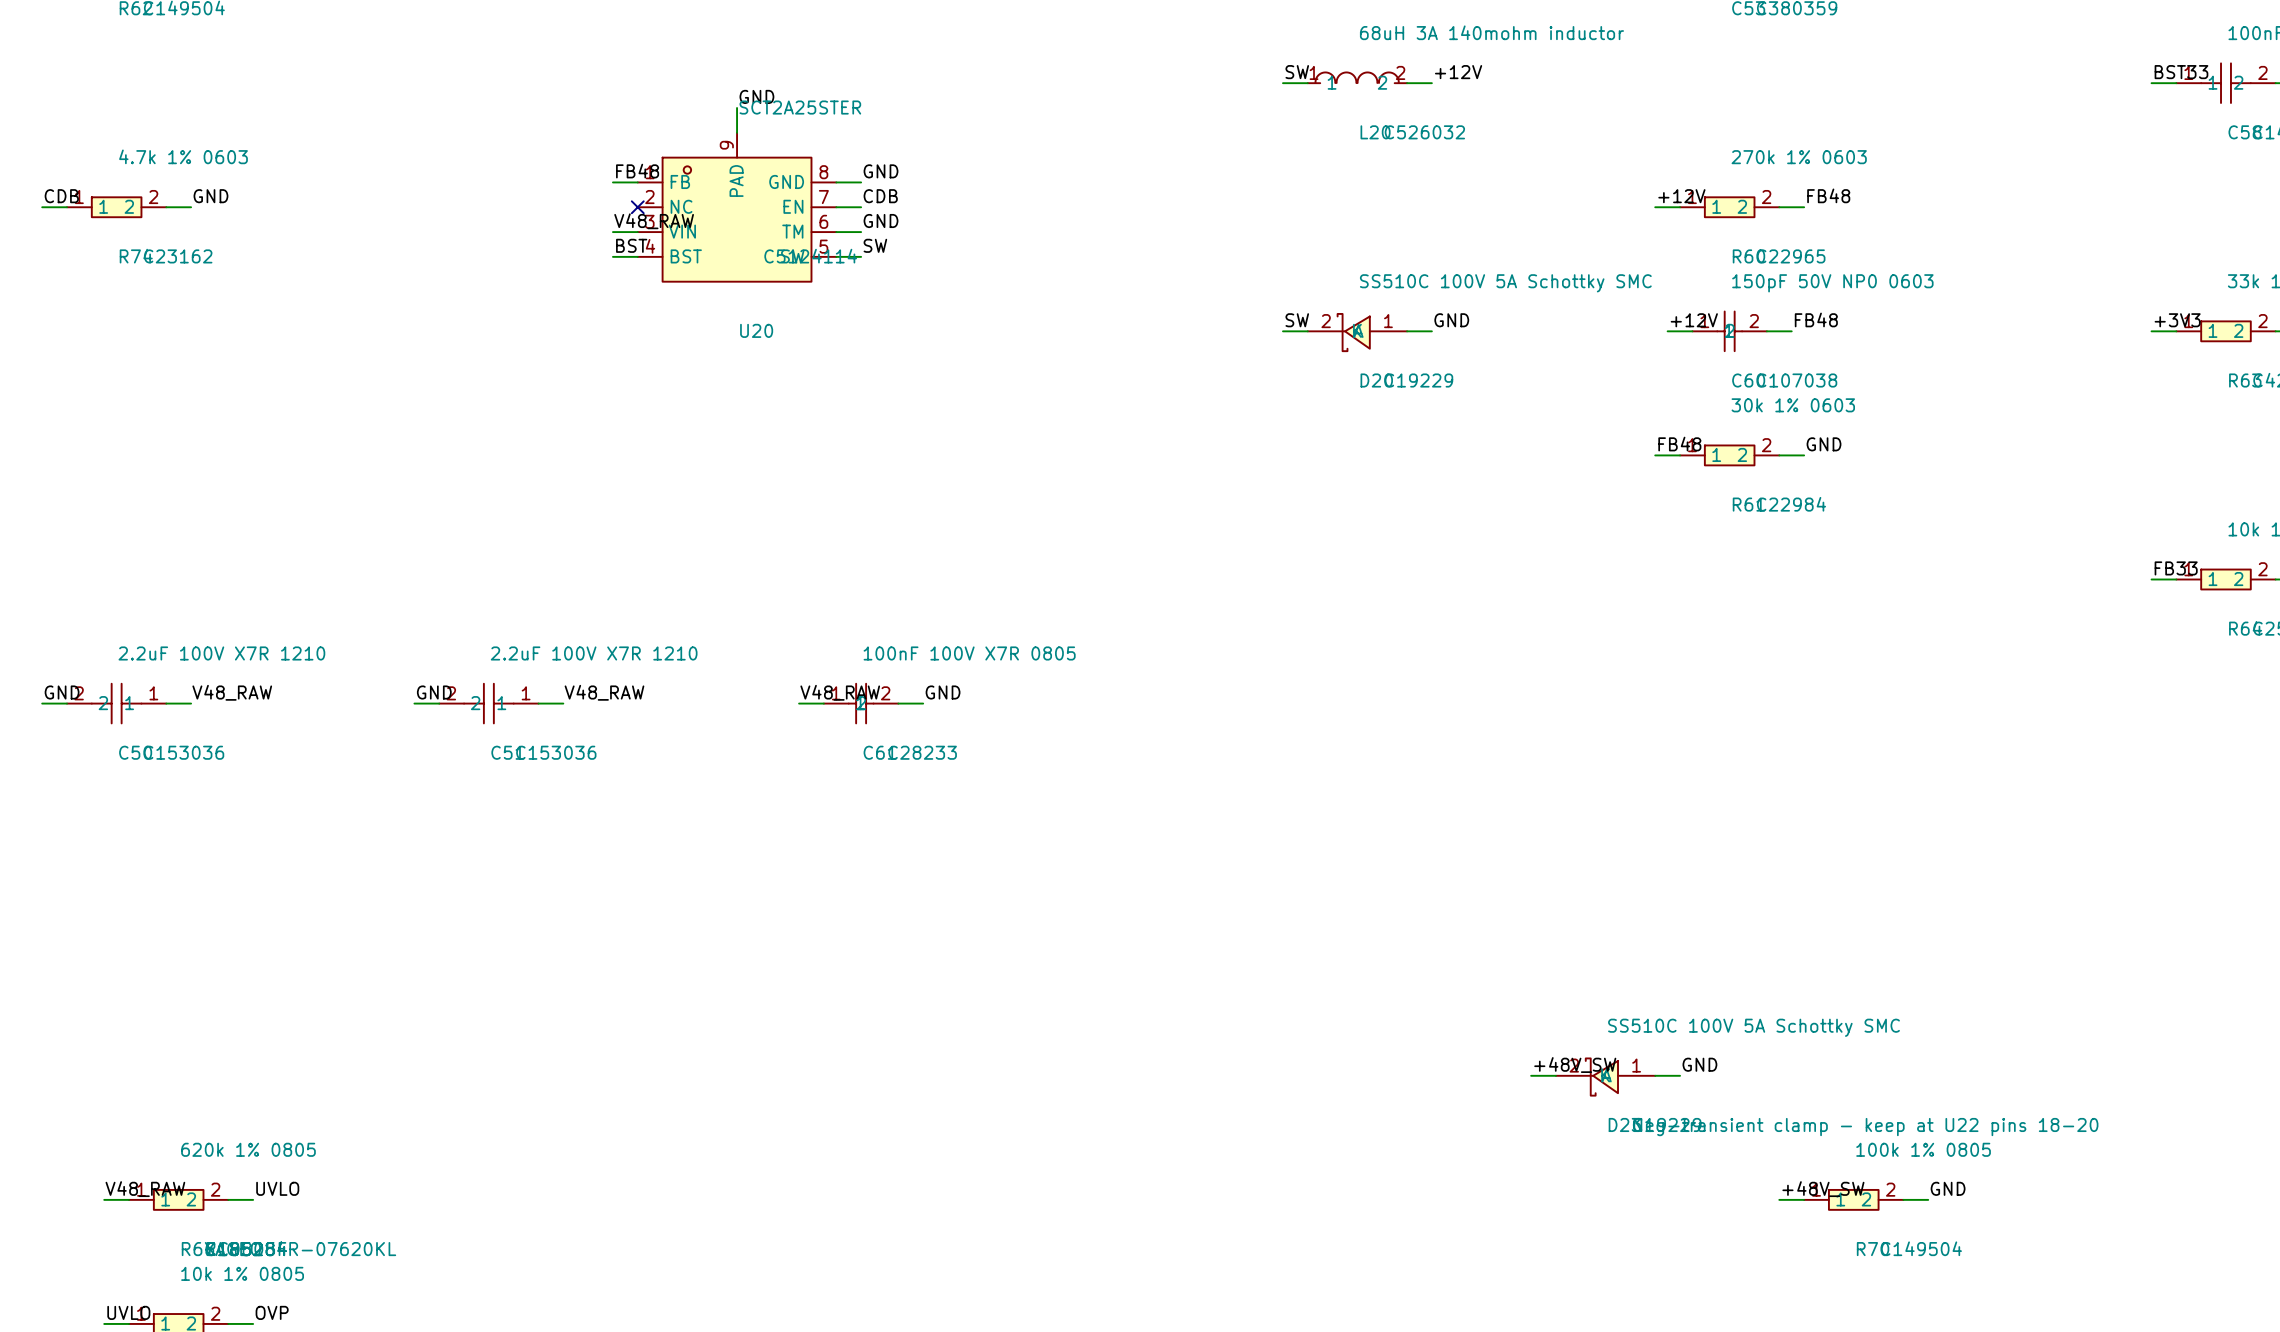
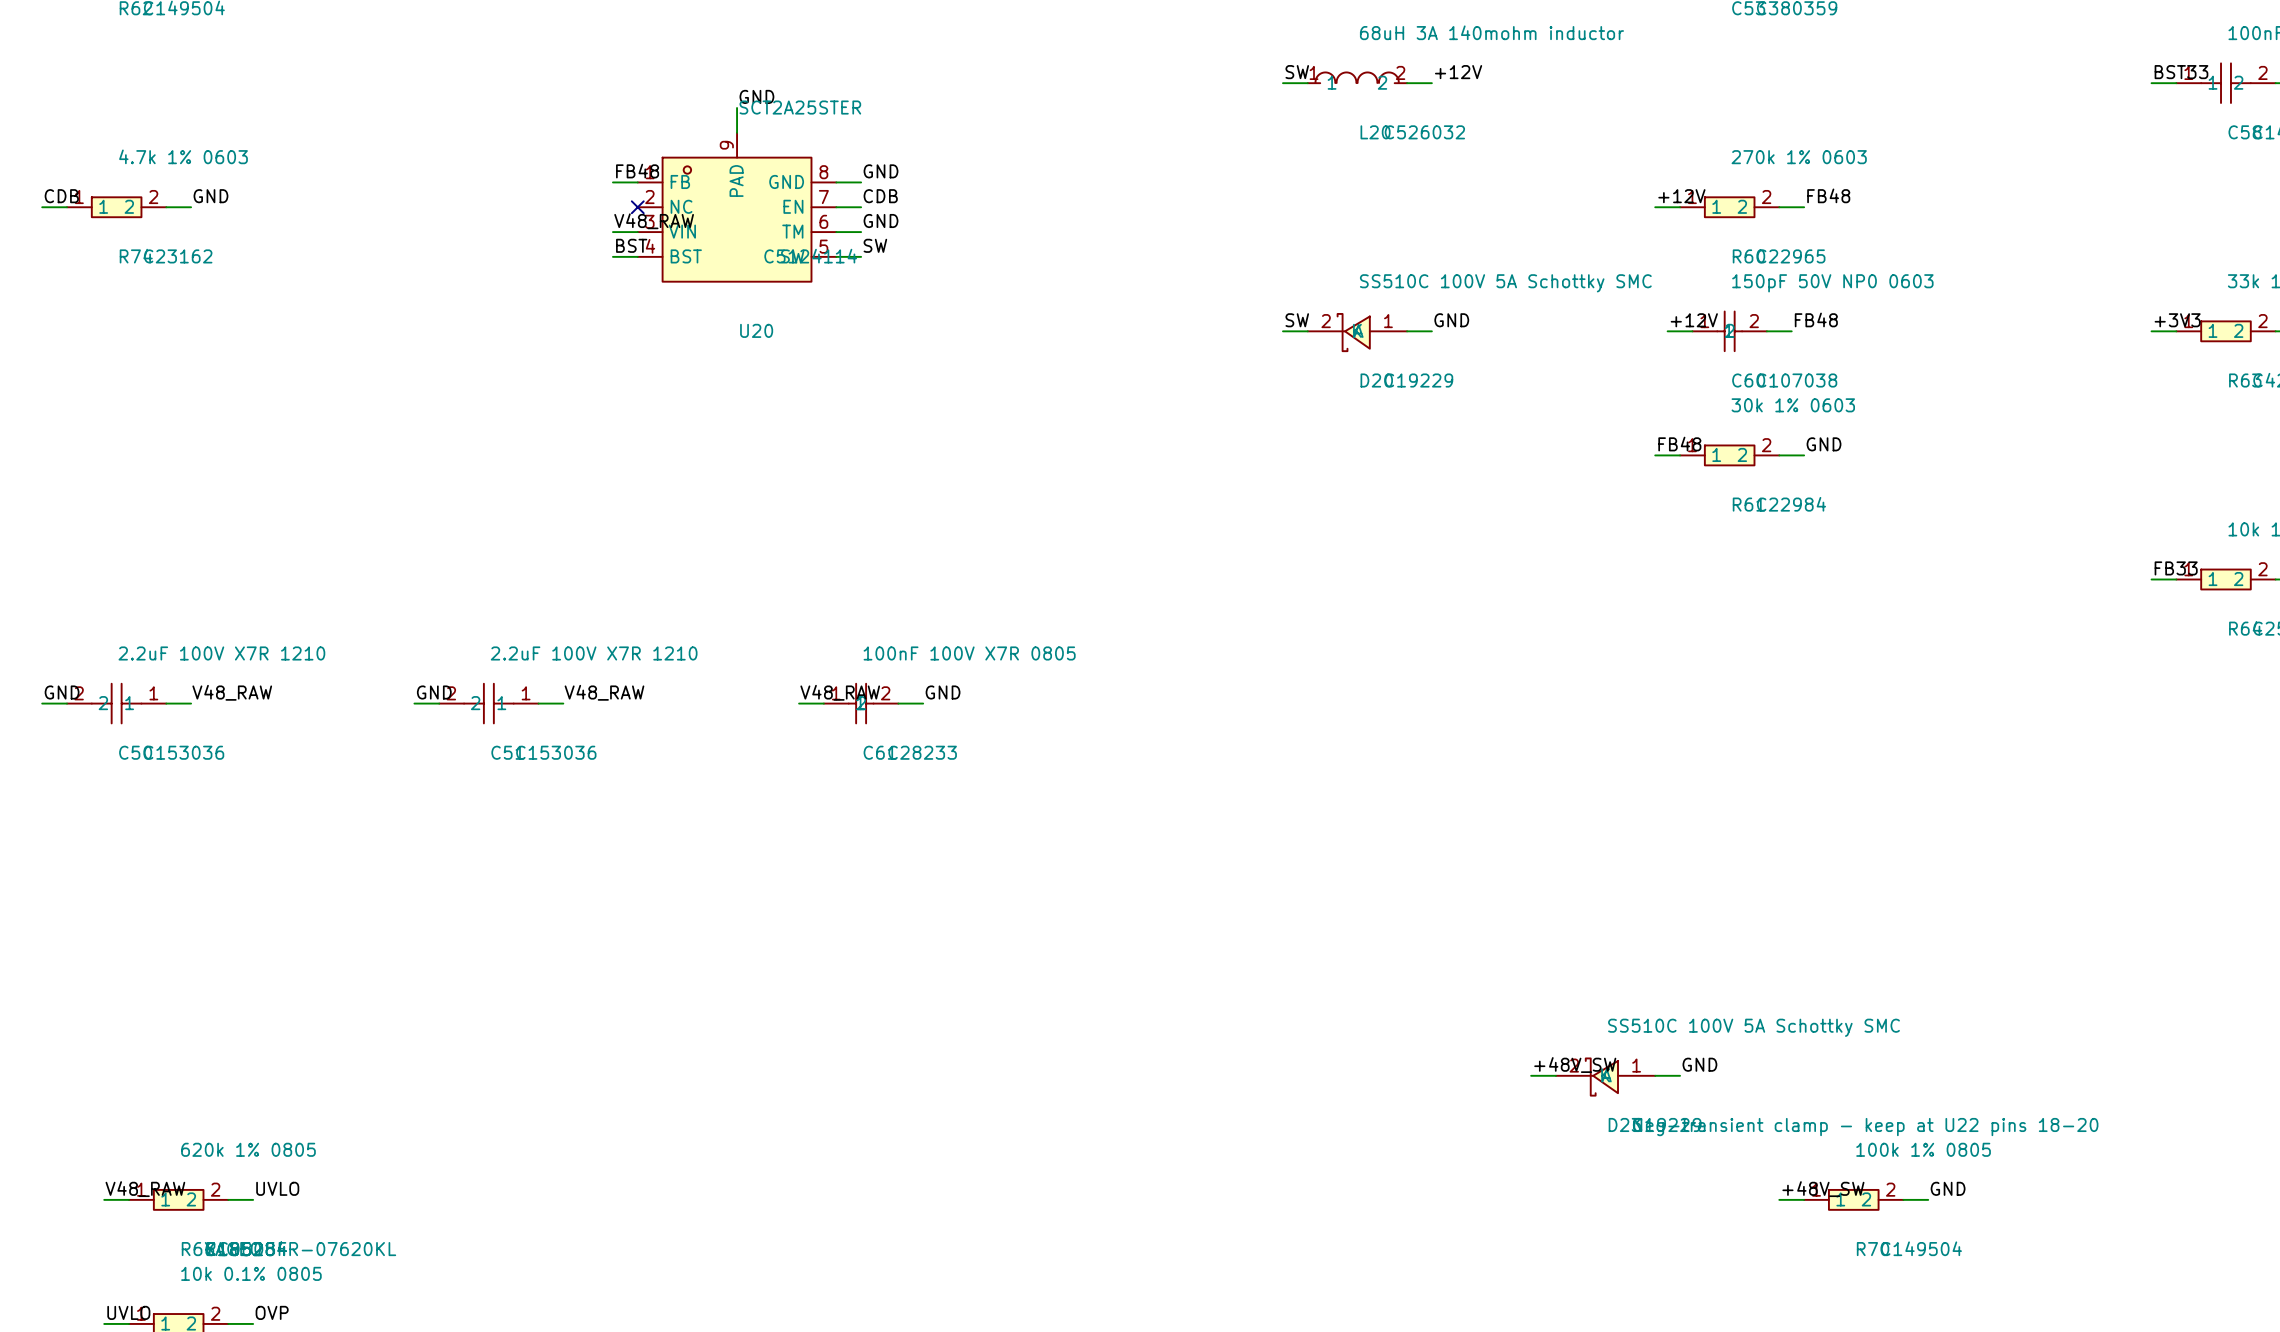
part value: 10k 1% 0805 (242, 1273) -> 10k 0.1% 0805 (251, 1273)

